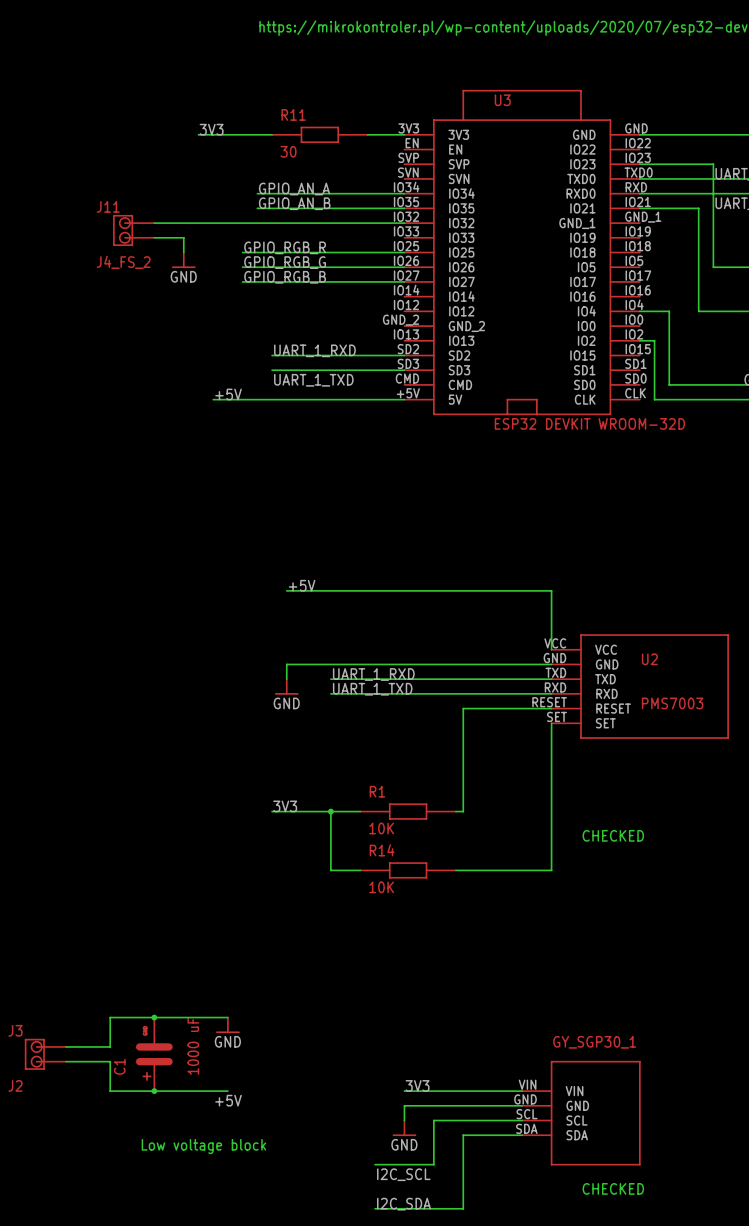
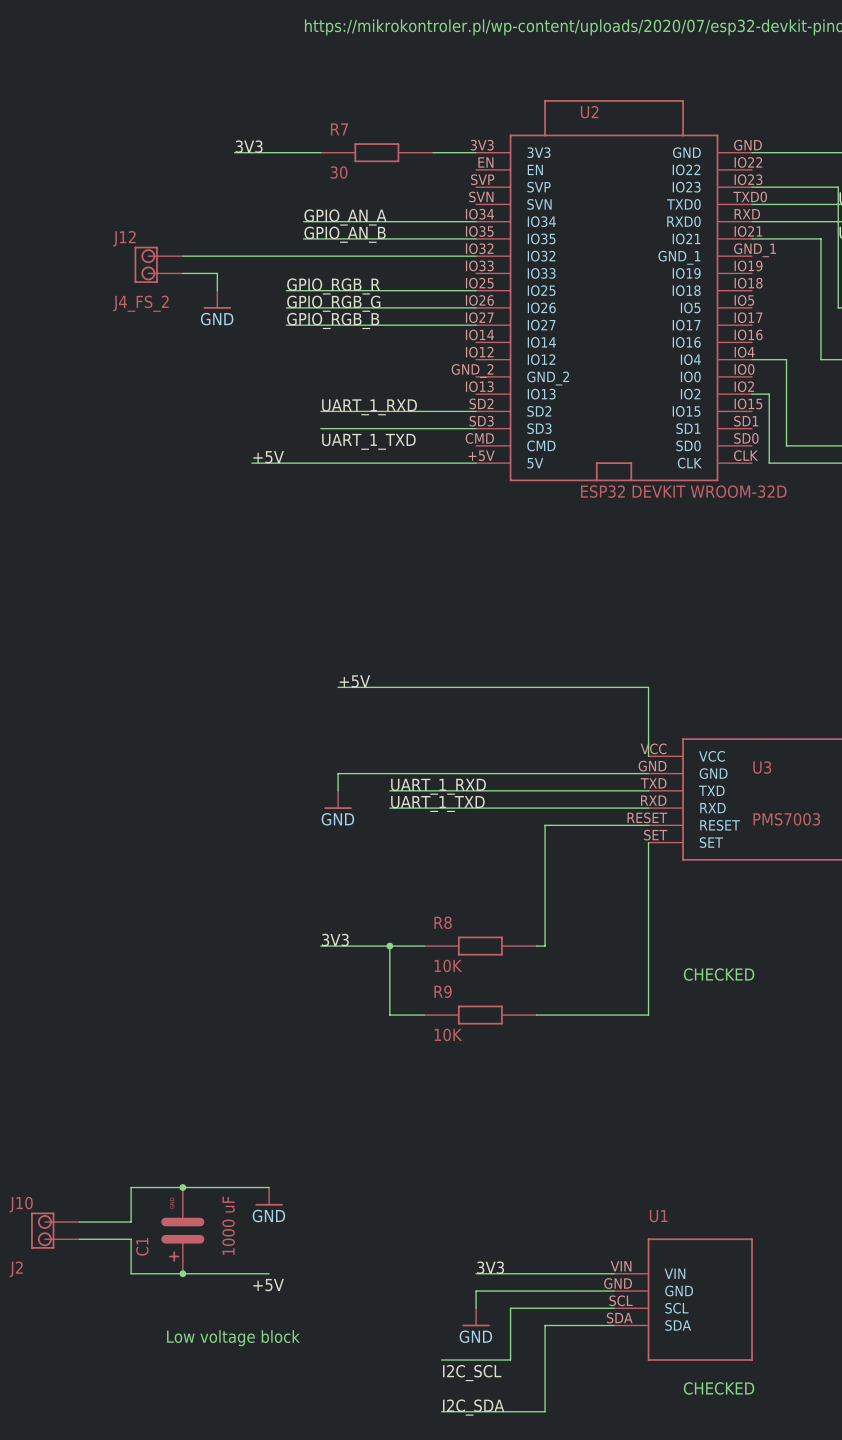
U3 name: U3 (502, 100) -> U2 (589, 112)
R11 name: R11 (293, 114) -> R7 (339, 129)
J11 name: J11 (108, 206) -> J12 (124, 238)
U2 name: U2 (649, 659) -> U3 (762, 767)
R1 name: R1 (377, 791) -> R8 (443, 922)
R14 name: R14 (382, 850) -> R9 (443, 991)
J3 name: J3 (15, 1030) -> J10 (21, 1204)
GY_SGP30_1 name: GY_SGP30_1 (594, 1042) -> U1 (658, 1216)

